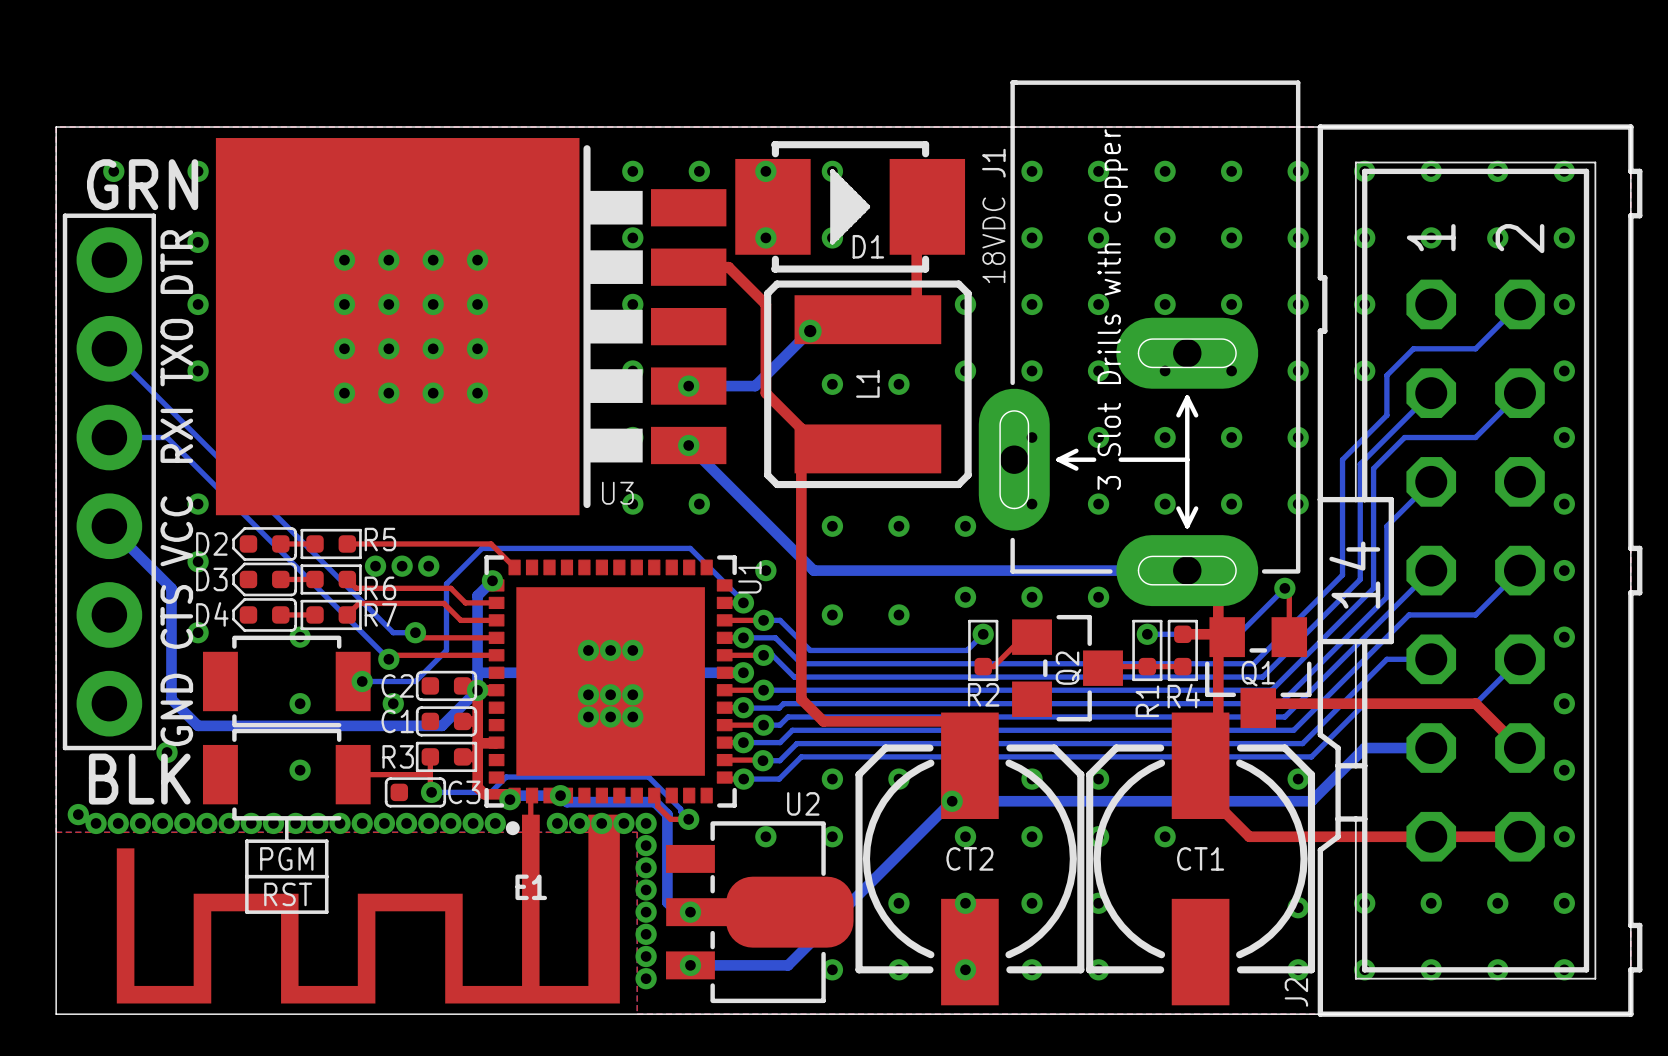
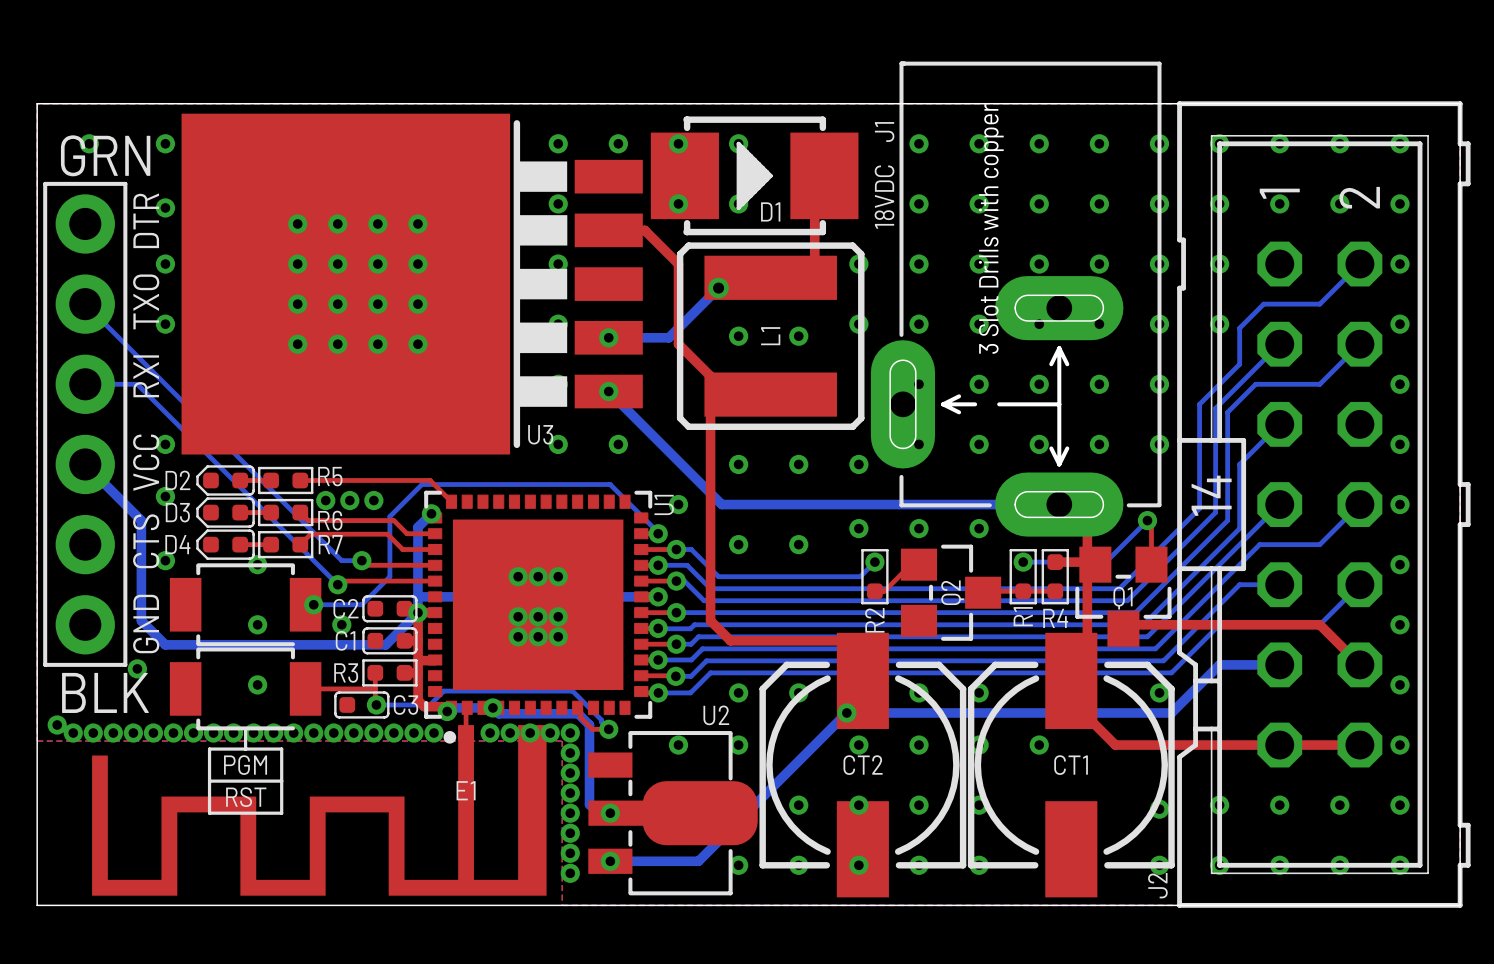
R2 name rotation: 0° (983, 694) -> 90° counterclockwise (874, 620)

